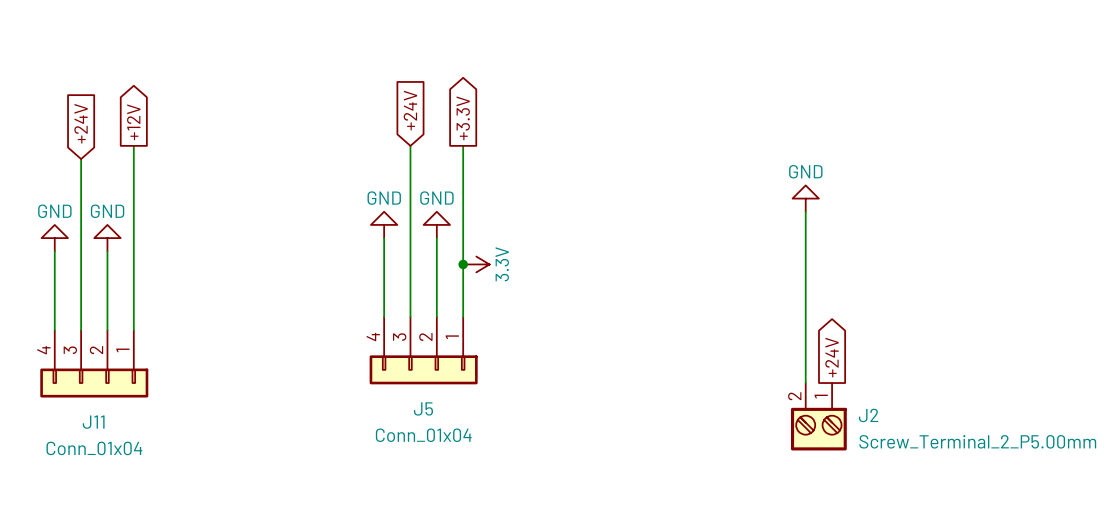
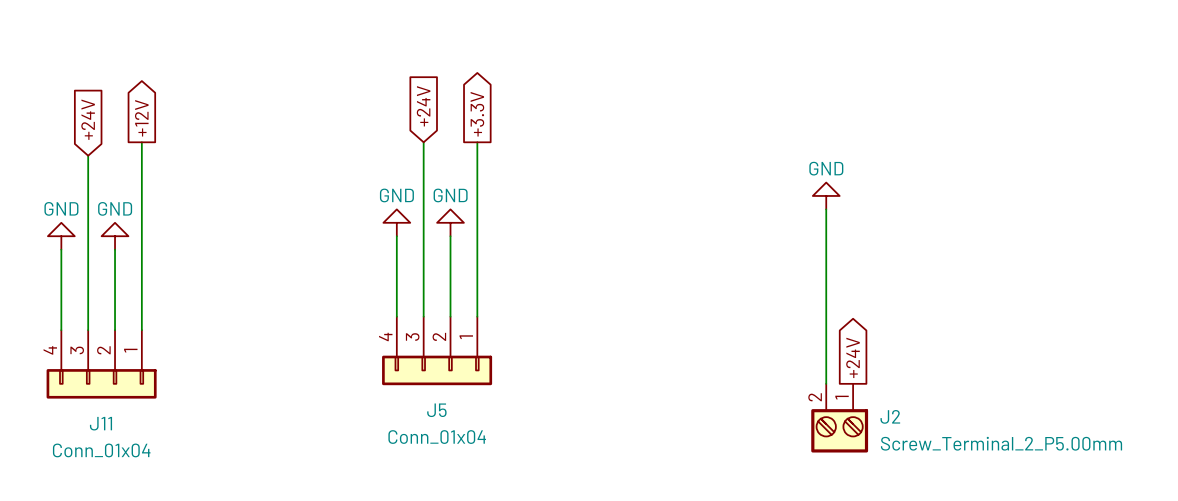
junction: (463, 264) -> none
power symbol: 3.3V (476, 264) -> none

